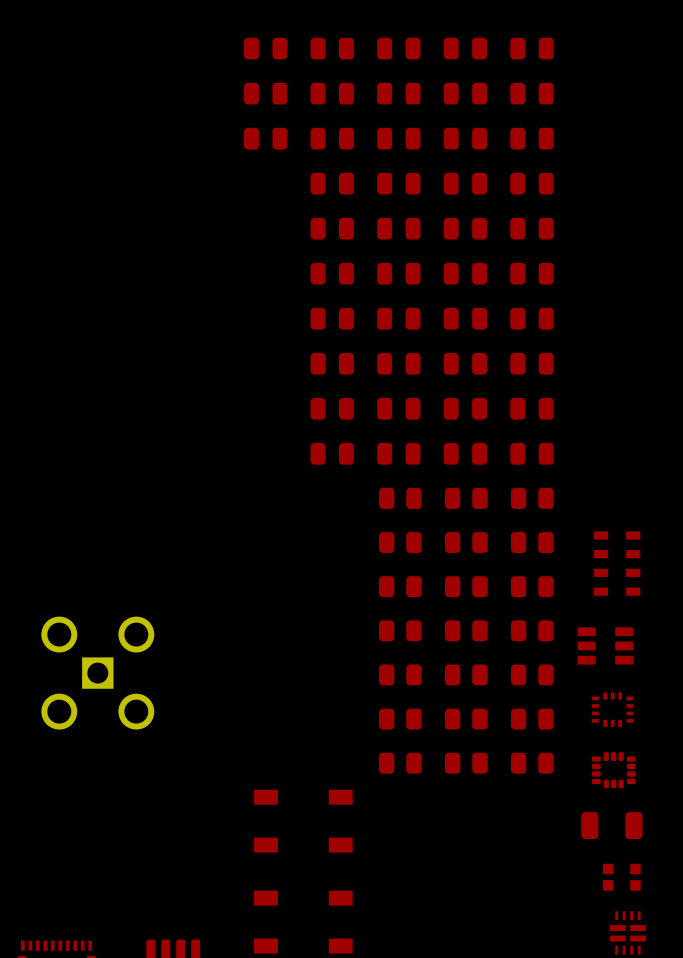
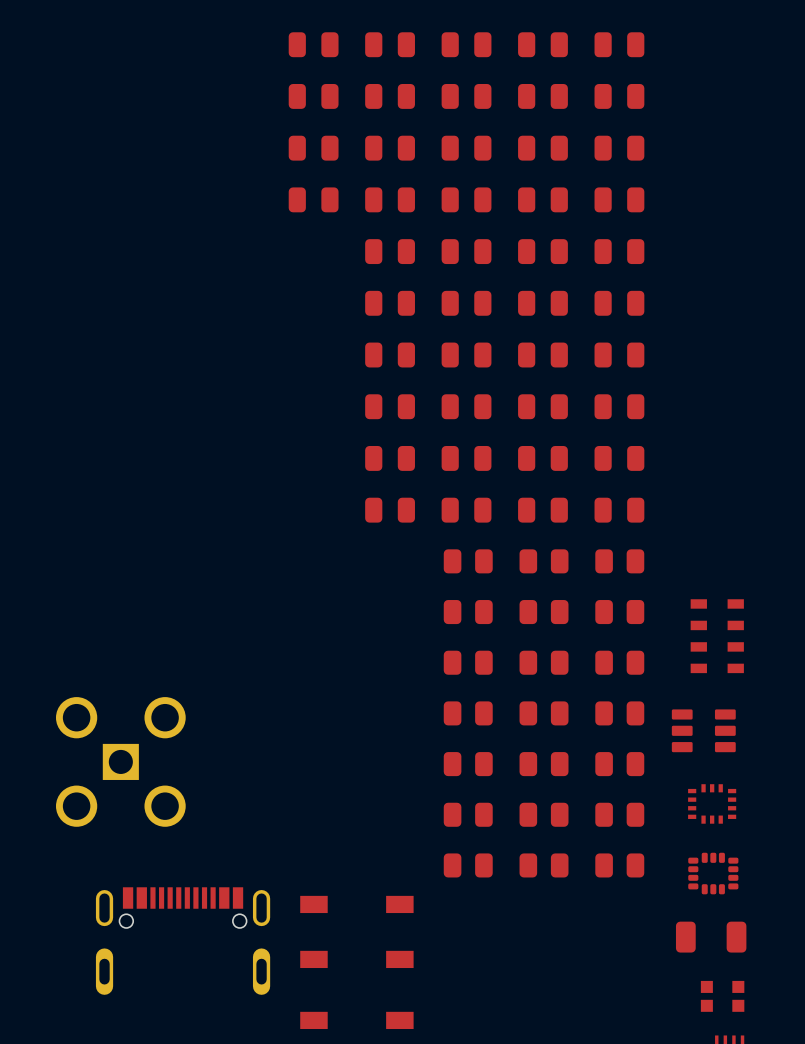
part: none -> (313, 199)
part: none -> (183, 941)

